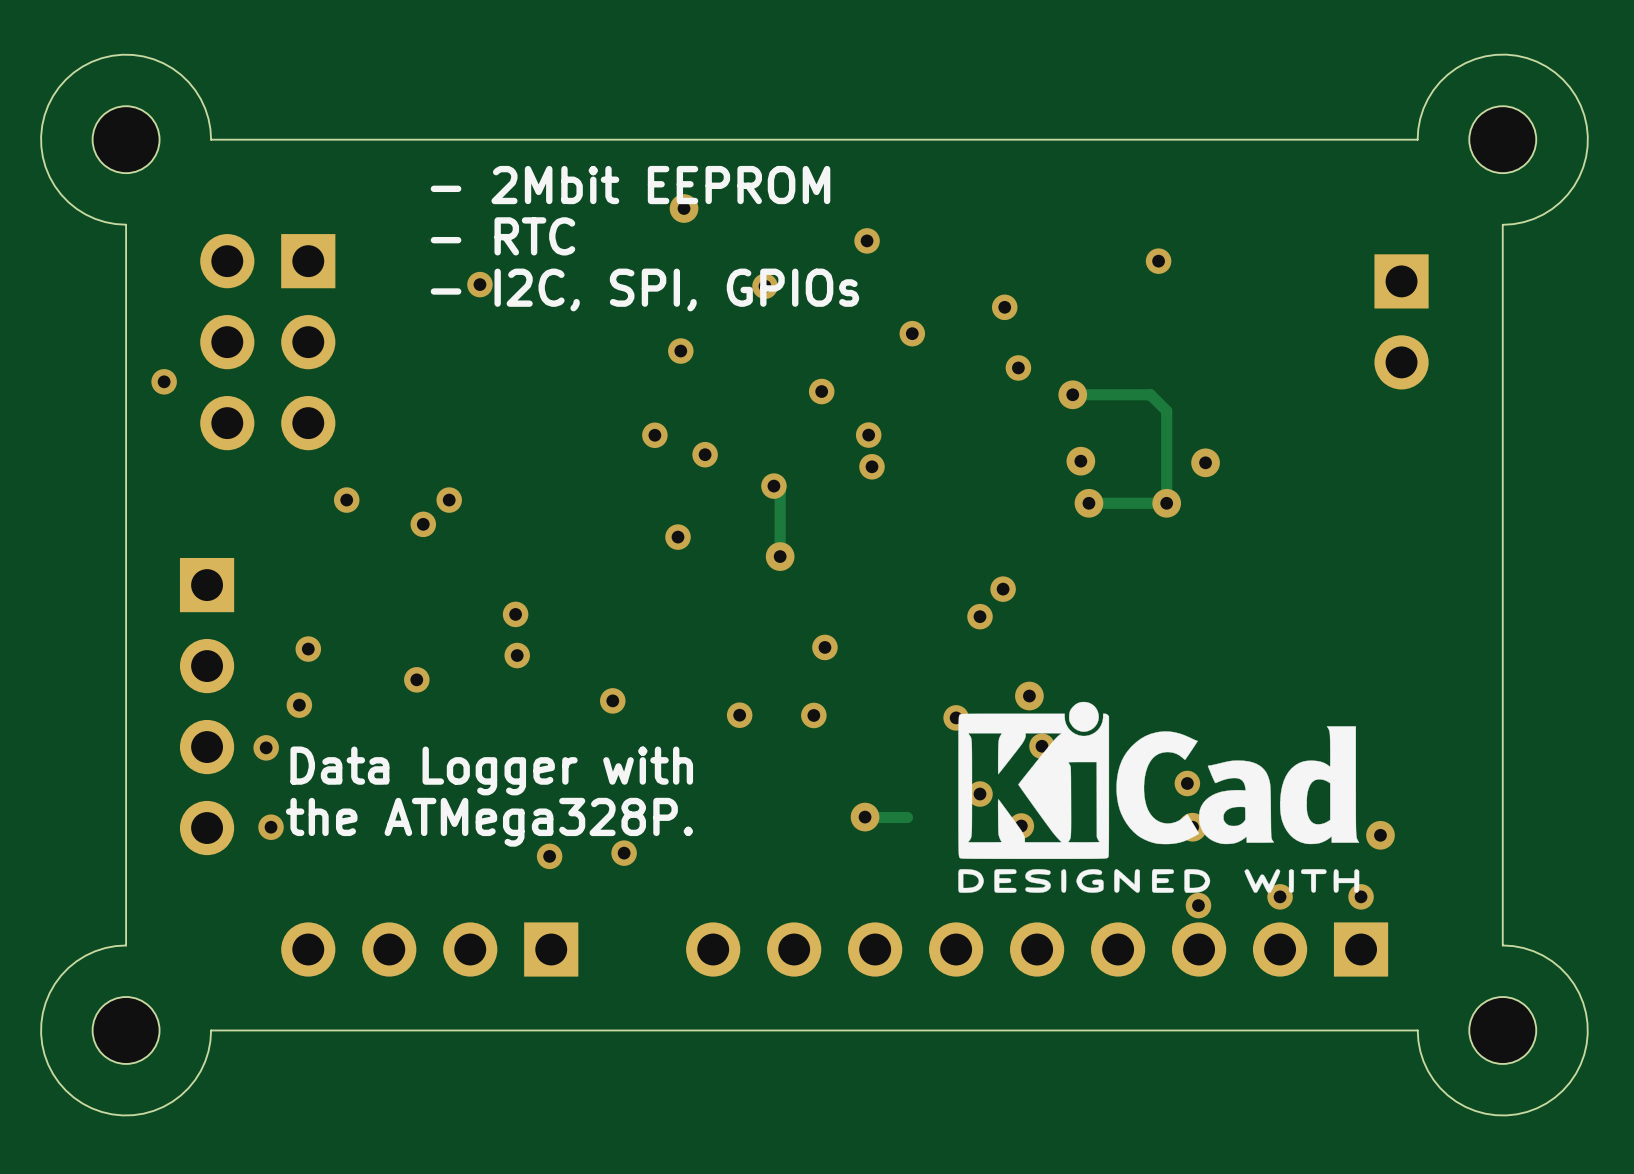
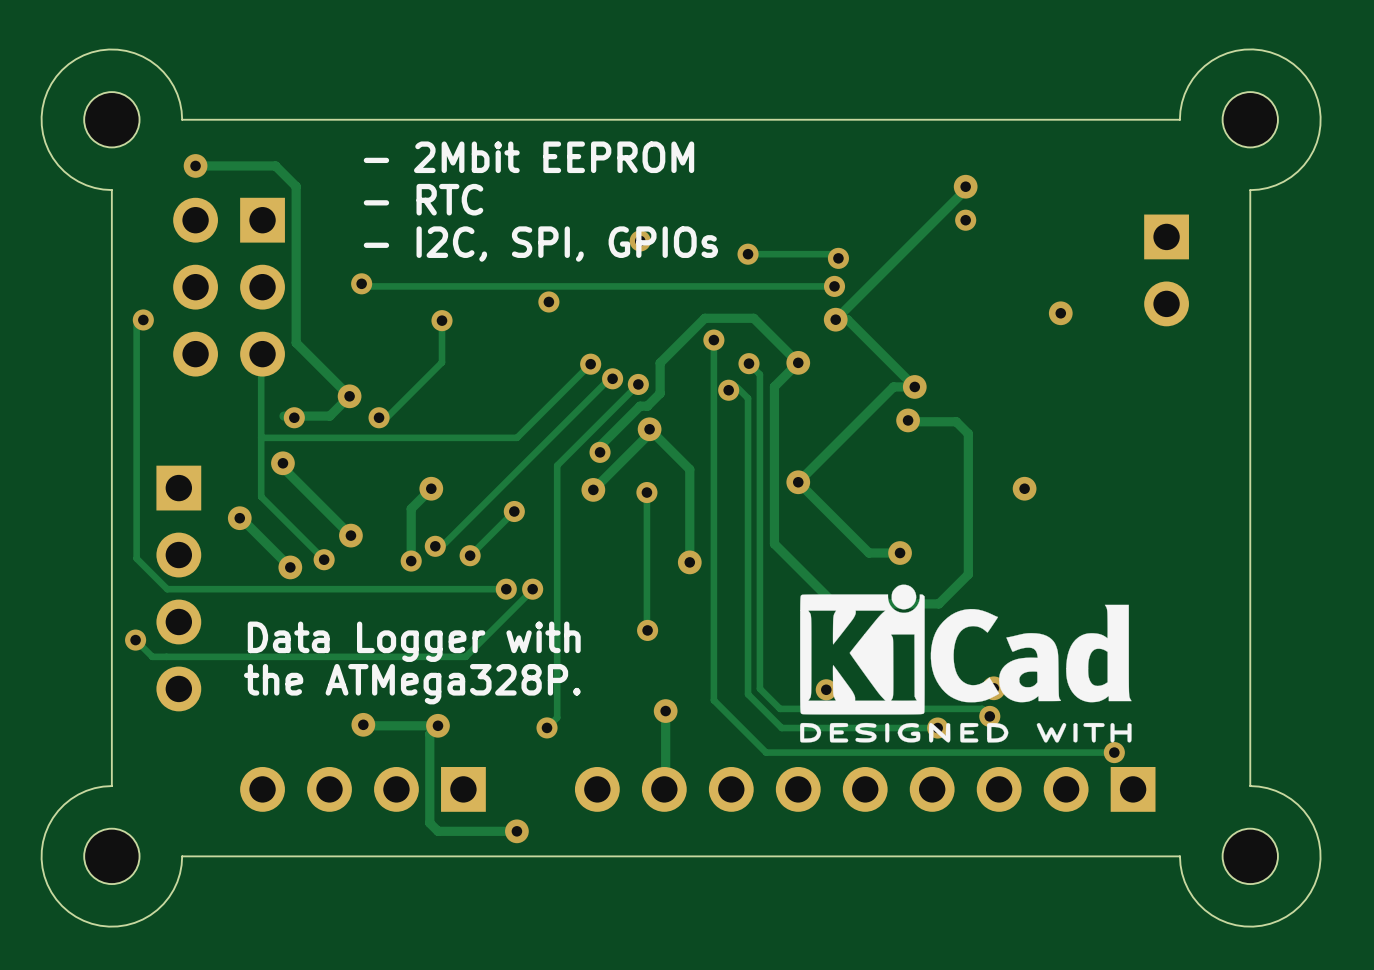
track: none -> (195, 165) (275, 165) (296, 186) (296, 342) (349, 396) (329, 416) (283, 416)
via: none -> (195, 165)
via: (684, 208) -> none
track: none -> (965, 186) (965, 189) (835, 319) (847, 319) (914, 386) (893, 386) (798, 482) (869, 553) (900, 553)
via: none -> (965, 186)
via: (867, 240) -> none
via: (479, 284) -> none
via: none -> (748, 254)
track: none -> (831, 254) (748, 254)
via: (912, 333) -> none
track: none -> (361, 283) (364, 286) (834, 286)
via: none -> (361, 283)
via position: (680, 351) -> (548, 301)
via position: (1018, 367) -> (834, 286)
via: none -> (1060, 313)
via: none -> (835, 319)
track: none -> (442, 320) (442, 362) (385, 418)
via: none -> (442, 320)
track: none -> (136, 325) (136, 558) (167, 589) (506, 589)
via: (821, 391) -> none
track: (1072, 394) (1150, 394) (1166, 410) (1166, 503) (1088, 503) -> none
via: (1072, 394) -> none
track: none -> (713, 340) (713, 700) (766, 752) (1114, 752)
via: none -> (713, 340)
track: none -> (262, 354) (262, 369) (259, 372) (261, 496) (324, 559)
via: none -> (798, 362)
track: none -> (748, 363) (759, 374) (759, 688) (780, 708) (982, 708) (989, 716)
via: none -> (748, 363)
via: (654, 435) -> none
track: none -> (590, 364) (517, 437) (261, 437)
via: (868, 435) -> none
track: none -> (612, 378) (609, 378) (444, 543)
via: none -> (612, 378)
via position: (705, 454) -> (590, 364)
track: none -> (638, 384) (557, 465) (557, 717) (547, 727)
via: none -> (638, 384)
via position: (1080, 461) -> (914, 386)
track: none -> (736, 386) (748, 398) (748, 694) (781, 728) (937, 728)
via: (1205, 462) -> none
via: none -> (349, 396)
track: (773, 486) (780, 492) (780, 556) -> none
via: (773, 486) -> none
via: (1166, 503) -> none
track: none -> (914, 421) (956, 421) (968, 433) (968, 574) (938, 603) (834, 603) (774, 543) (774, 386) (798, 362) (753, 318) (704, 318) (660, 363) (660, 393) (647, 406) (640, 406) (600, 446) (600, 452)
via: none -> (649, 429)
via: (423, 524) -> none
via position: (678, 537) -> (600, 452)
track: none -> (282, 463) (282, 467) (350, 535)
via: none -> (282, 463)
via: (780, 556) -> none
via: none -> (798, 482)
track: none -> (431, 488) (411, 508) (411, 561)
via: none -> (431, 488)
via: none -> (1024, 488)
track: none -> (593, 489) (649, 433) (649, 429) (689, 469) (689, 562)
via: none -> (593, 489)
via: (1003, 589) -> none
track: none -> (646, 492) (647, 630)
via: none -> (646, 492)
track: none -> (514, 511) (470, 555)
via: none -> (514, 511)
via: (515, 614) -> none
via: (979, 616) -> none
track: none -> (239, 518) (290, 567)
via: none -> (239, 518)
via: none -> (350, 535)
via: (824, 647) -> none
via: (308, 649) -> none
via: none -> (470, 555)
via: none -> (411, 561)
via: none -> (689, 562)
via position: (416, 679) -> (324, 559)
via: none -> (290, 567)
via position: (1029, 696) -> (900, 553)
via: (612, 700) -> none
via: (299, 705) -> none
via: none -> (506, 589)
track: none -> (532, 589) (465, 656) (152, 656) (135, 640)
via: none -> (532, 589)
via: (739, 715) -> none
via: (813, 715) -> none
via: (956, 717) -> none
via: (1041, 746) -> none
via: (266, 747) -> none
via: none -> (647, 630)
via: none -> (135, 640)
via: (1187, 783) -> none
via: (979, 794) -> none
via: (865, 817) -> none
track: (907, 817) (865, 817) -> none
via: (1021, 826) -> none
via: (271, 827) -> none
via: none -> (826, 689)
via: (1380, 835) -> none
via position: (624, 853) -> (547, 727)
track: none -> (665, 711) (664, 789)
via: none -> (665, 711)
via: (549, 856) -> none
via: none -> (989, 716)
track: none -> (363, 724) (437, 725) (429, 733) (429, 823) (438, 831) (516, 831)
via: none -> (363, 724)
via: none -> (437, 725)
via: none -> (937, 728)
via: (1280, 896) -> none
via position: (1361, 896) -> (1114, 752)
via: (1198, 905) -> none
via: none -> (516, 831)

